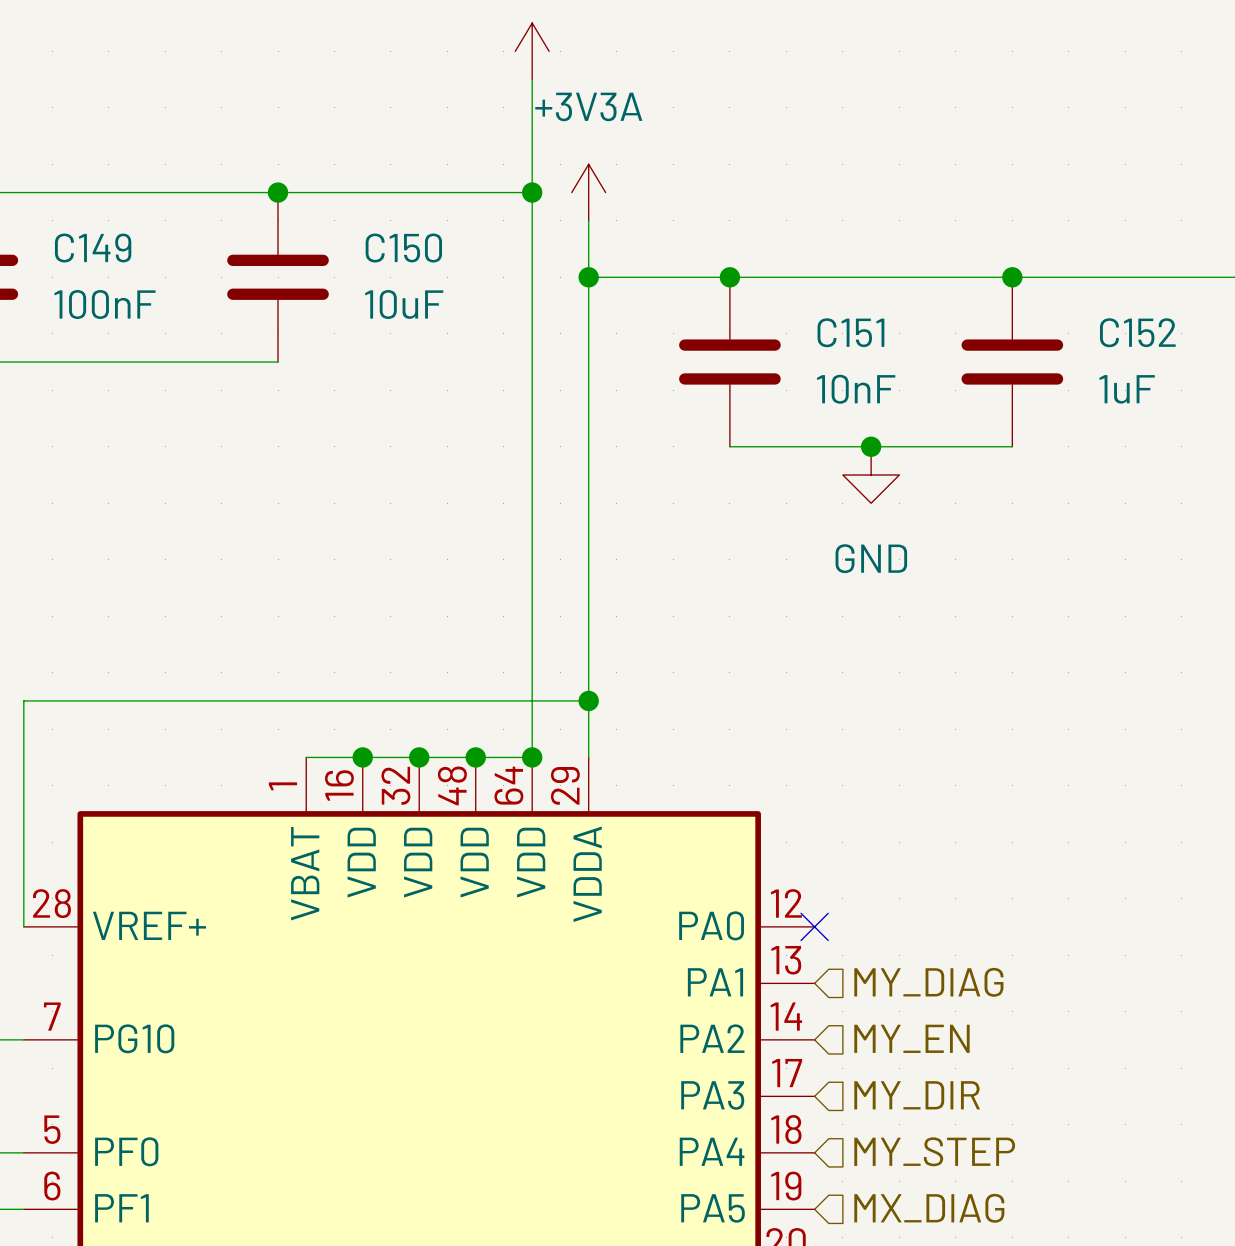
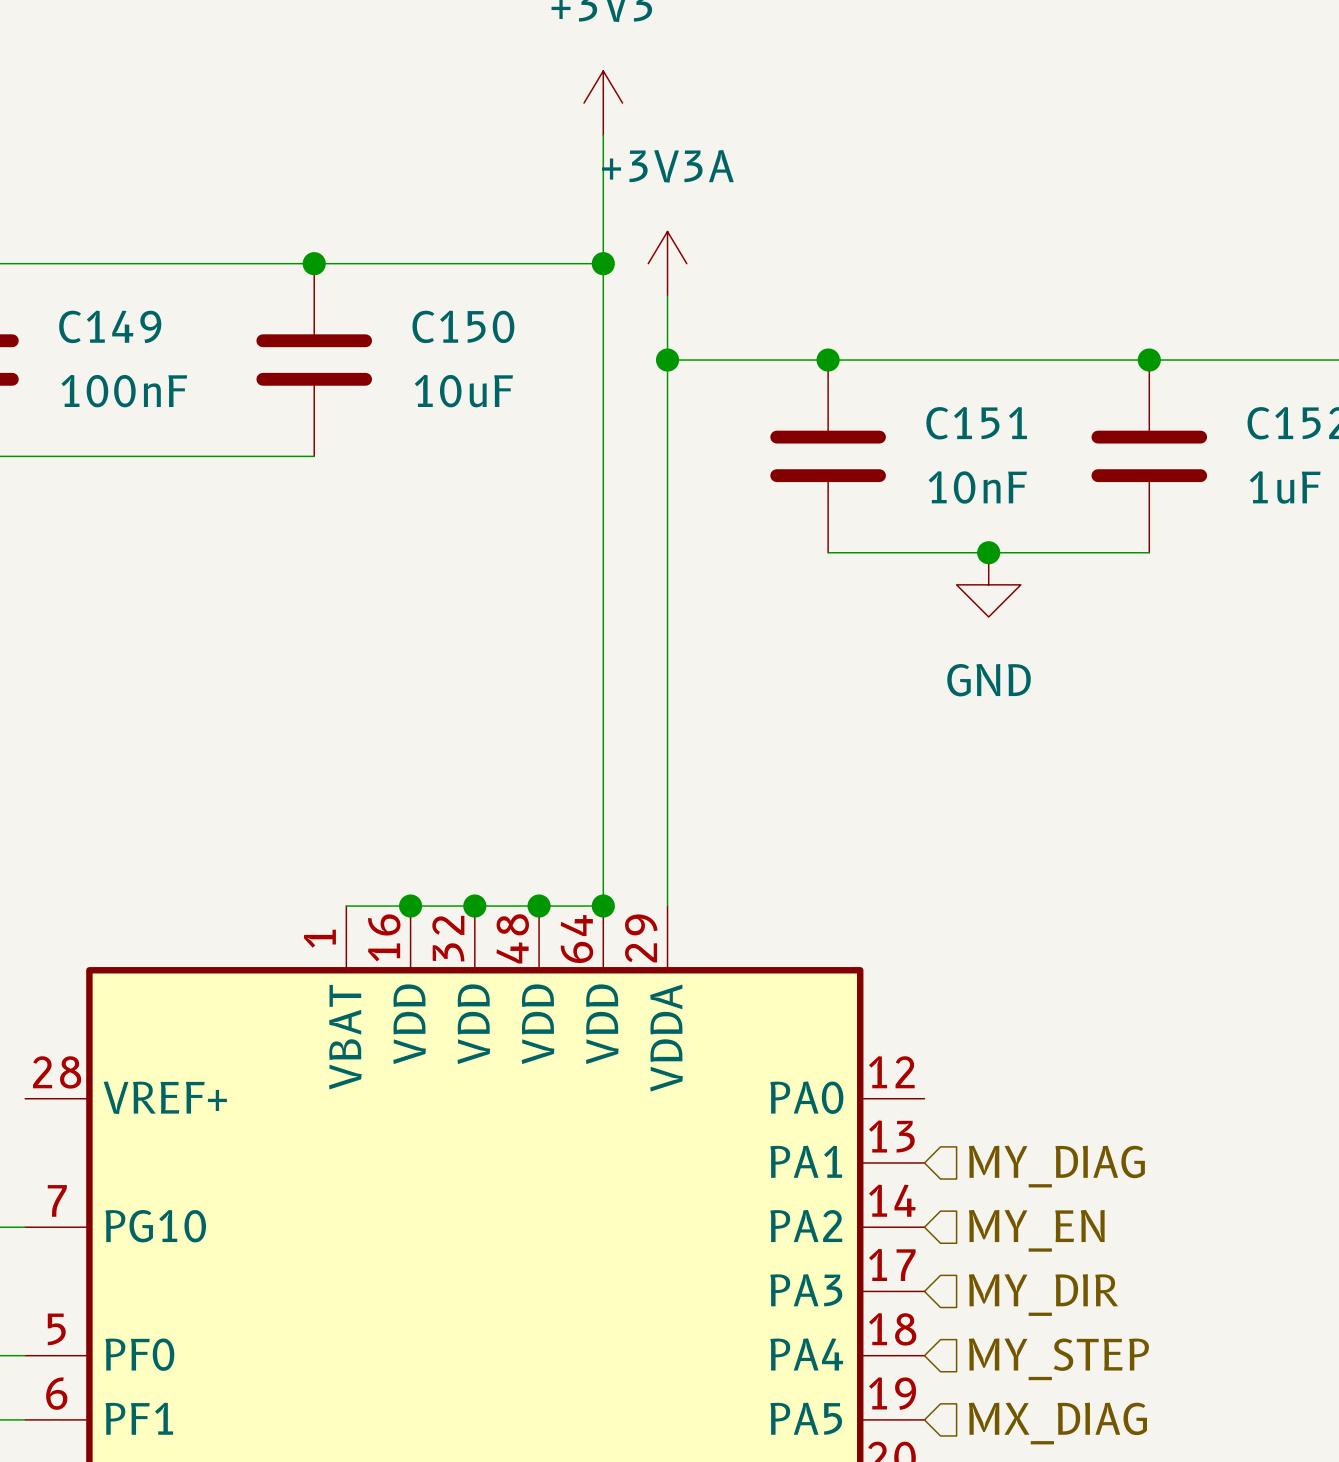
wire: (588, 700) (23, 700) (23, 926) -> none
junction: (588, 700) -> none
no-connect mark: (814, 926) -> none

